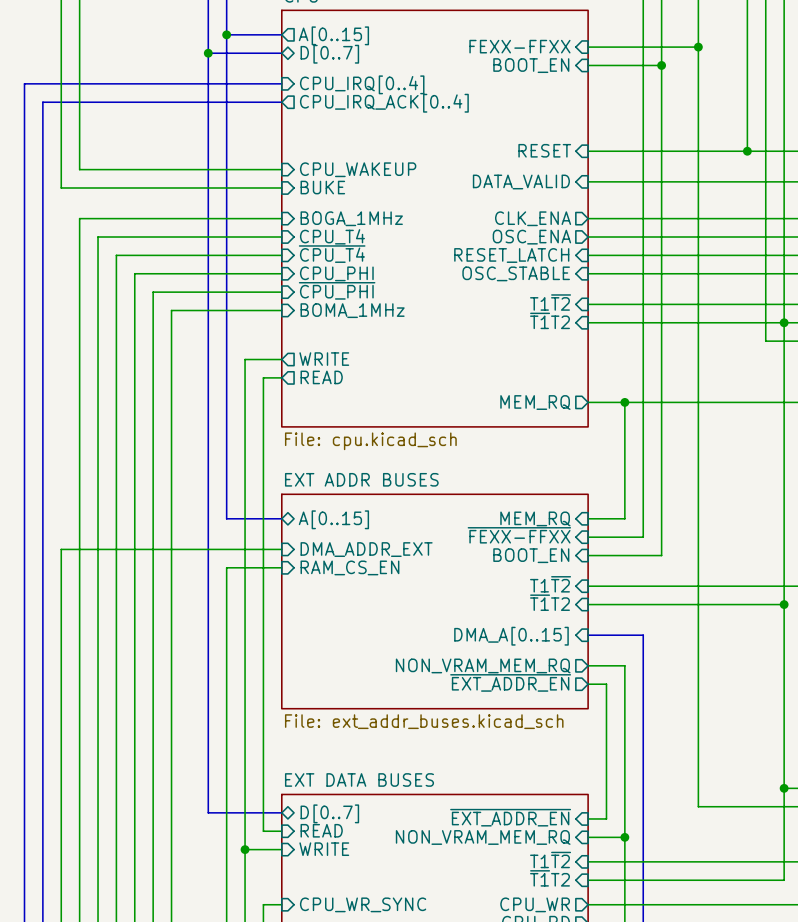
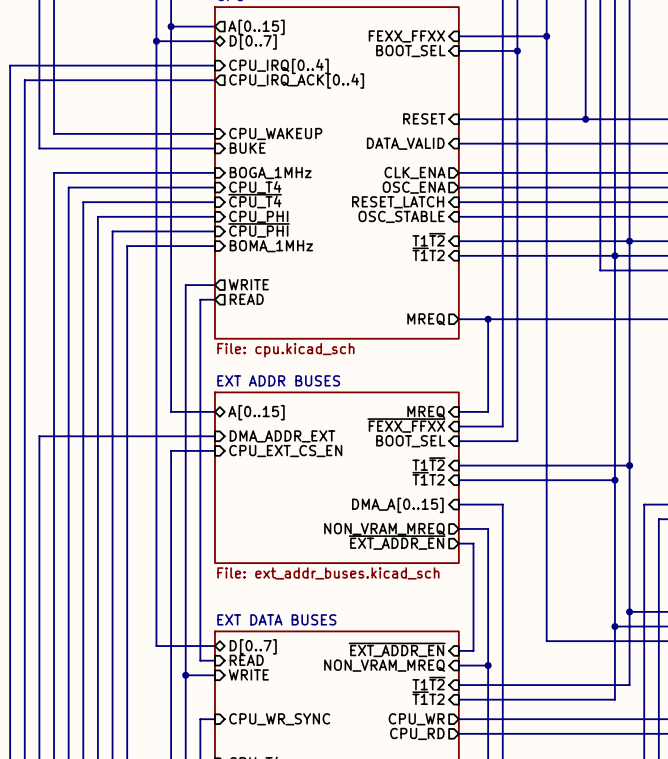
sheet pin: FEXX-FFXX (519, 46) -> FEXX_FFXX (406, 36)
sheet pin: BOOT_EN (531, 65) -> BOOT_SEL (410, 51)
sheet pin: MEM_RQ (535, 402) -> MREQ (426, 319)
sheet pin: MEM_RQ (535, 518) -> MREQ (426, 412)
sheet pin: ~{FEXX-FFXX} (519, 535) -> ~{FEXX_FFXX} (406, 425)
sheet pin: BOOT_EN (531, 555) -> BOOT_SEL (410, 441)
sheet pin: RAM_CS_EN (349, 567) -> CPU_EXT_CS_EN (285, 451)
sheet pin: NON_VRAM_MEM_RQ (483, 665) -> NON_VRAM_MREQ (384, 529)
sheet pin: NON_VRAM_MEM_RQ (483, 837) -> NON_VRAM_MREQ (384, 665)

